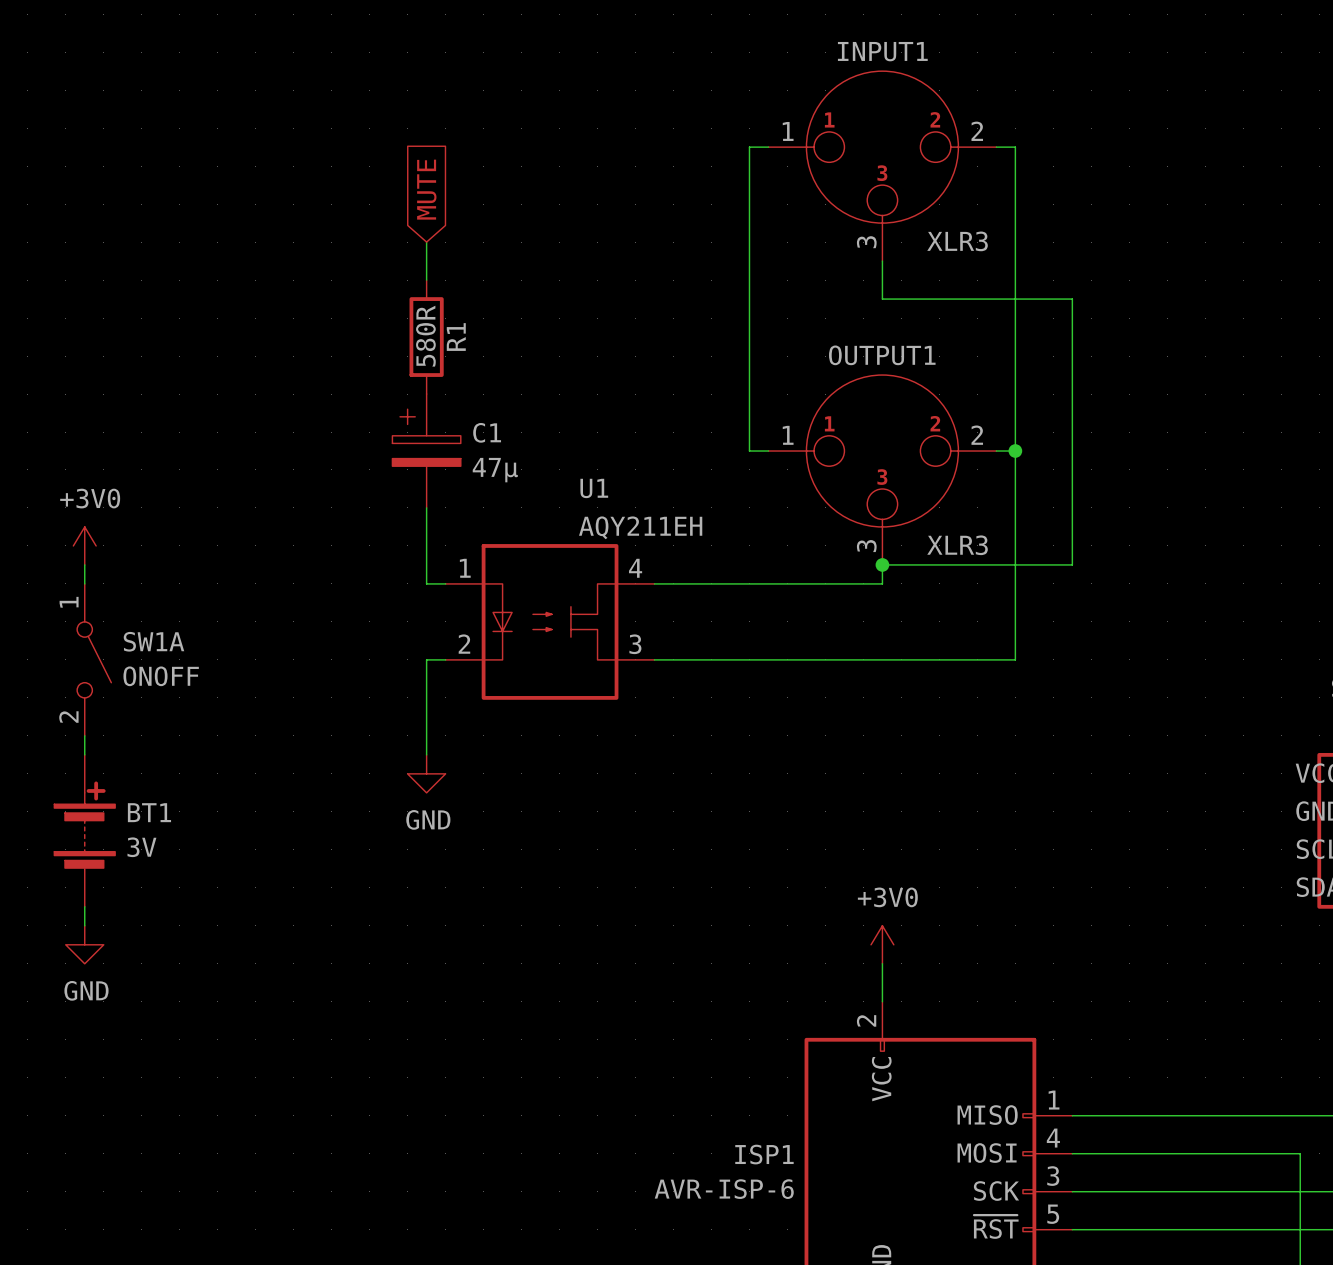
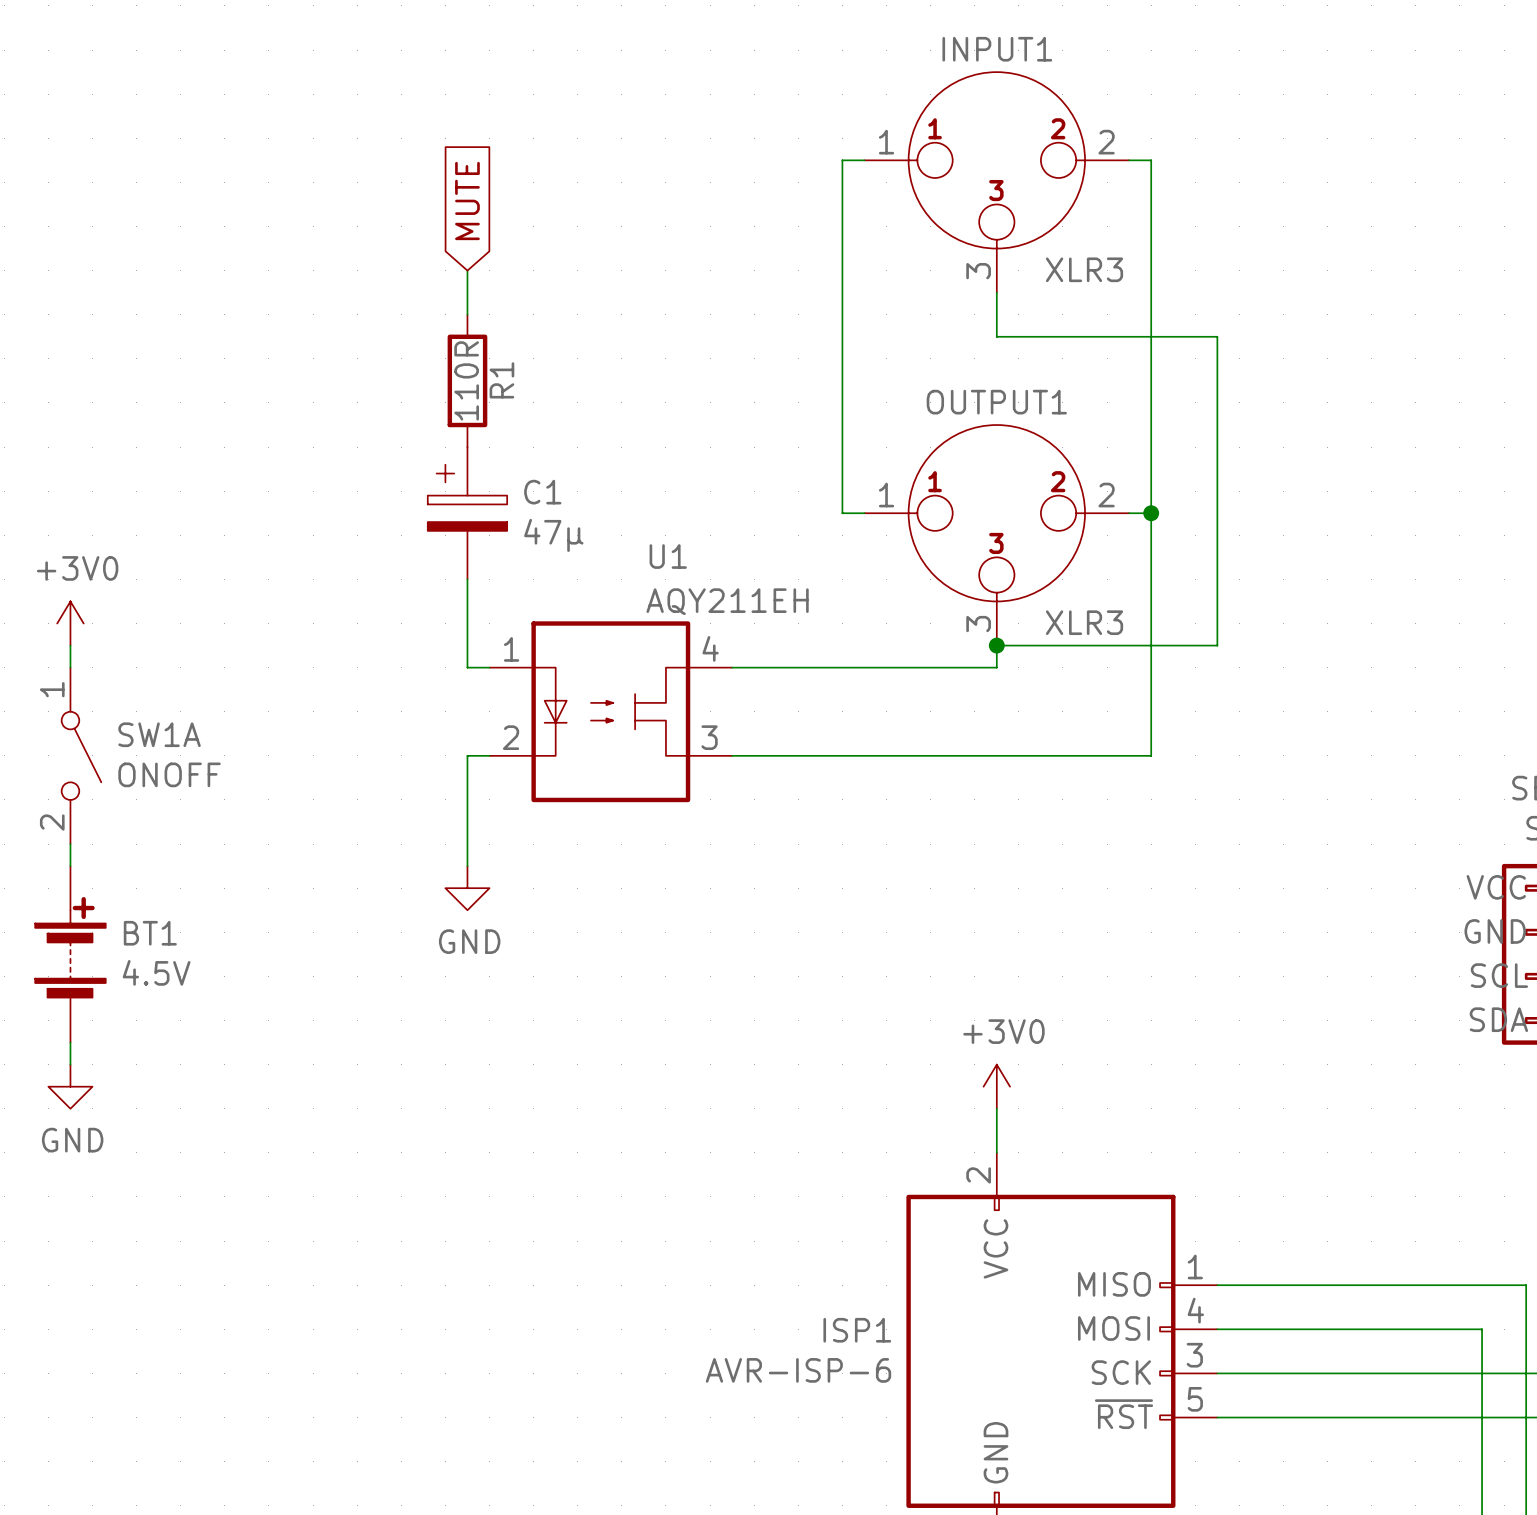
R1 value: 580R (425, 336) -> 110R (466, 380)
BT1 value: 3V (141, 847) -> 4.5V (156, 972)

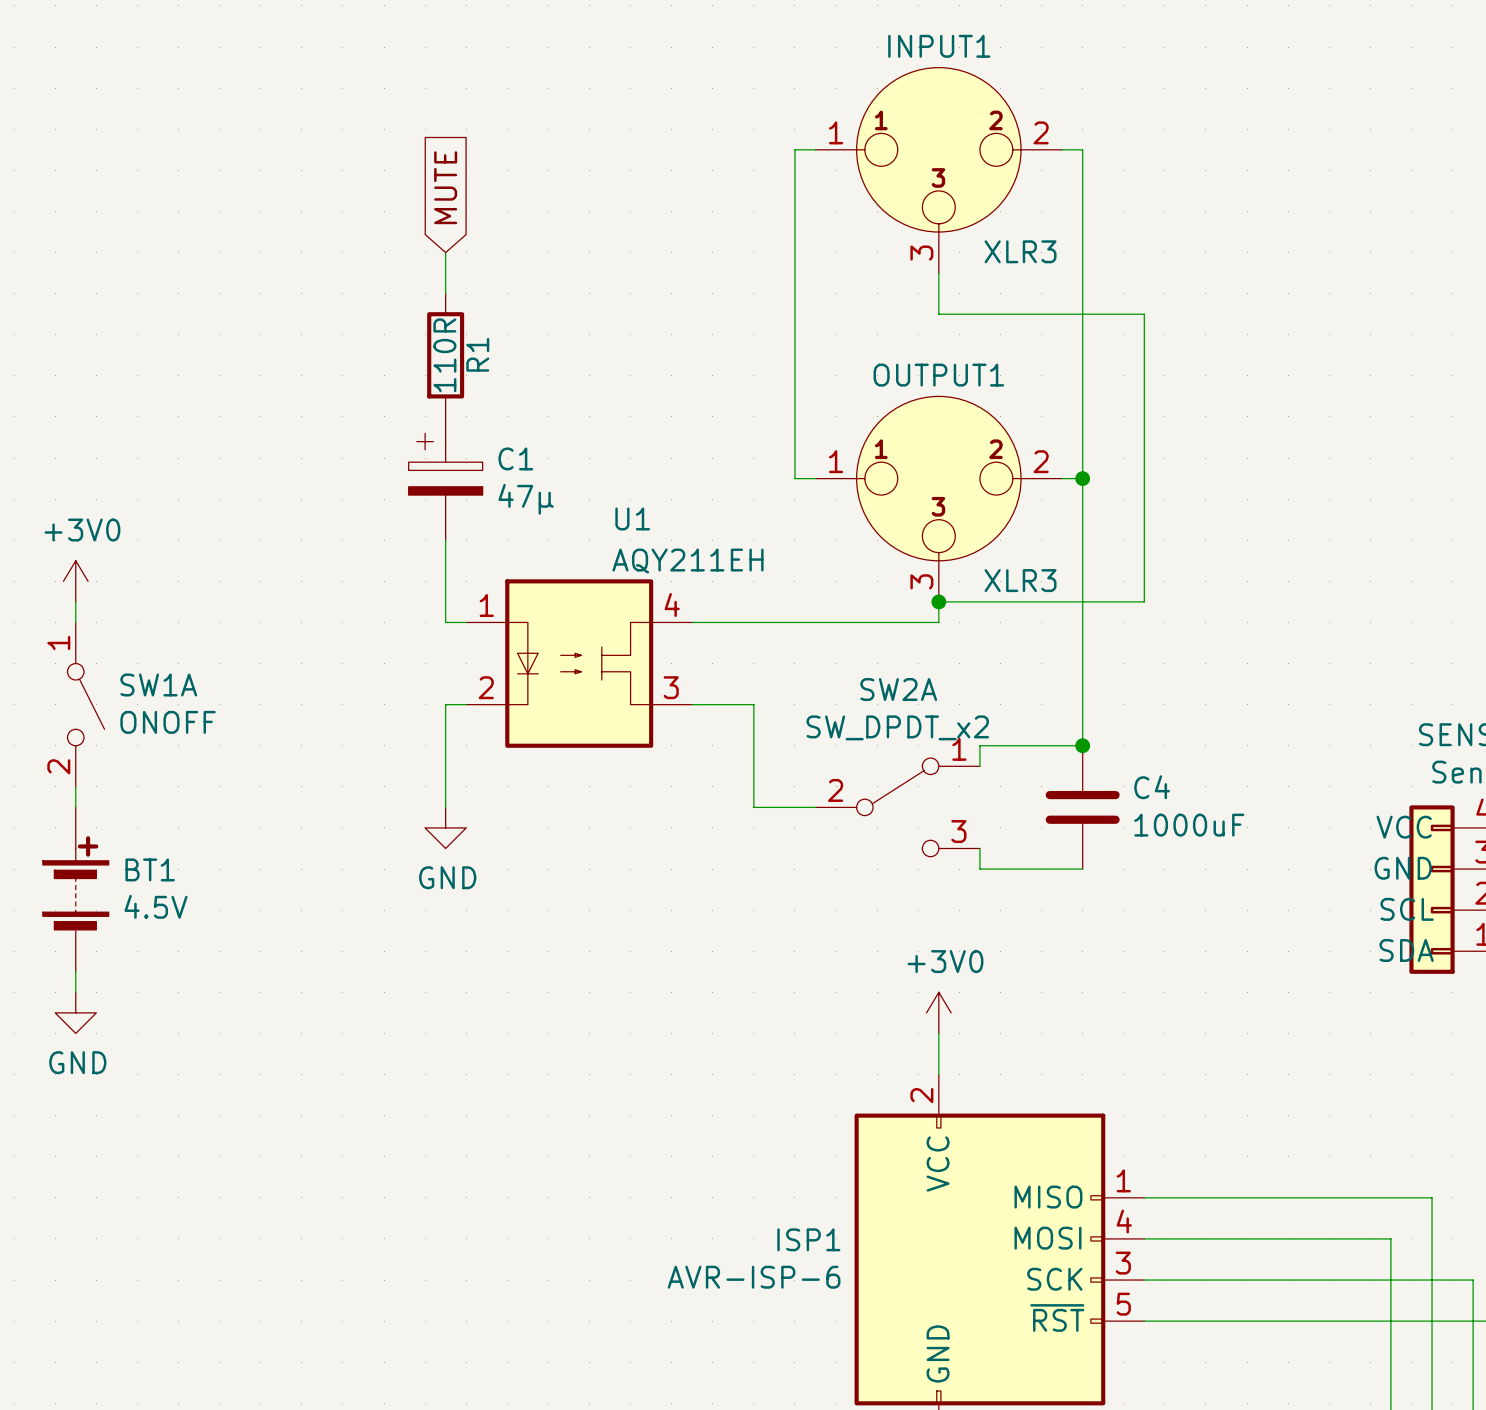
wire: (798, 755) (1151, 755) -> (979, 766) (979, 745) (1082, 745) (1082, 704)
wire: none -> (753, 704) (753, 807) (815, 807)
junction: none -> (1082, 745)
SW2A: none -> SW_DPDT_x2 (897, 807)
C4: none -> 1000uF (1082, 807)
wire: none -> (979, 848) (979, 869) (1082, 869)

